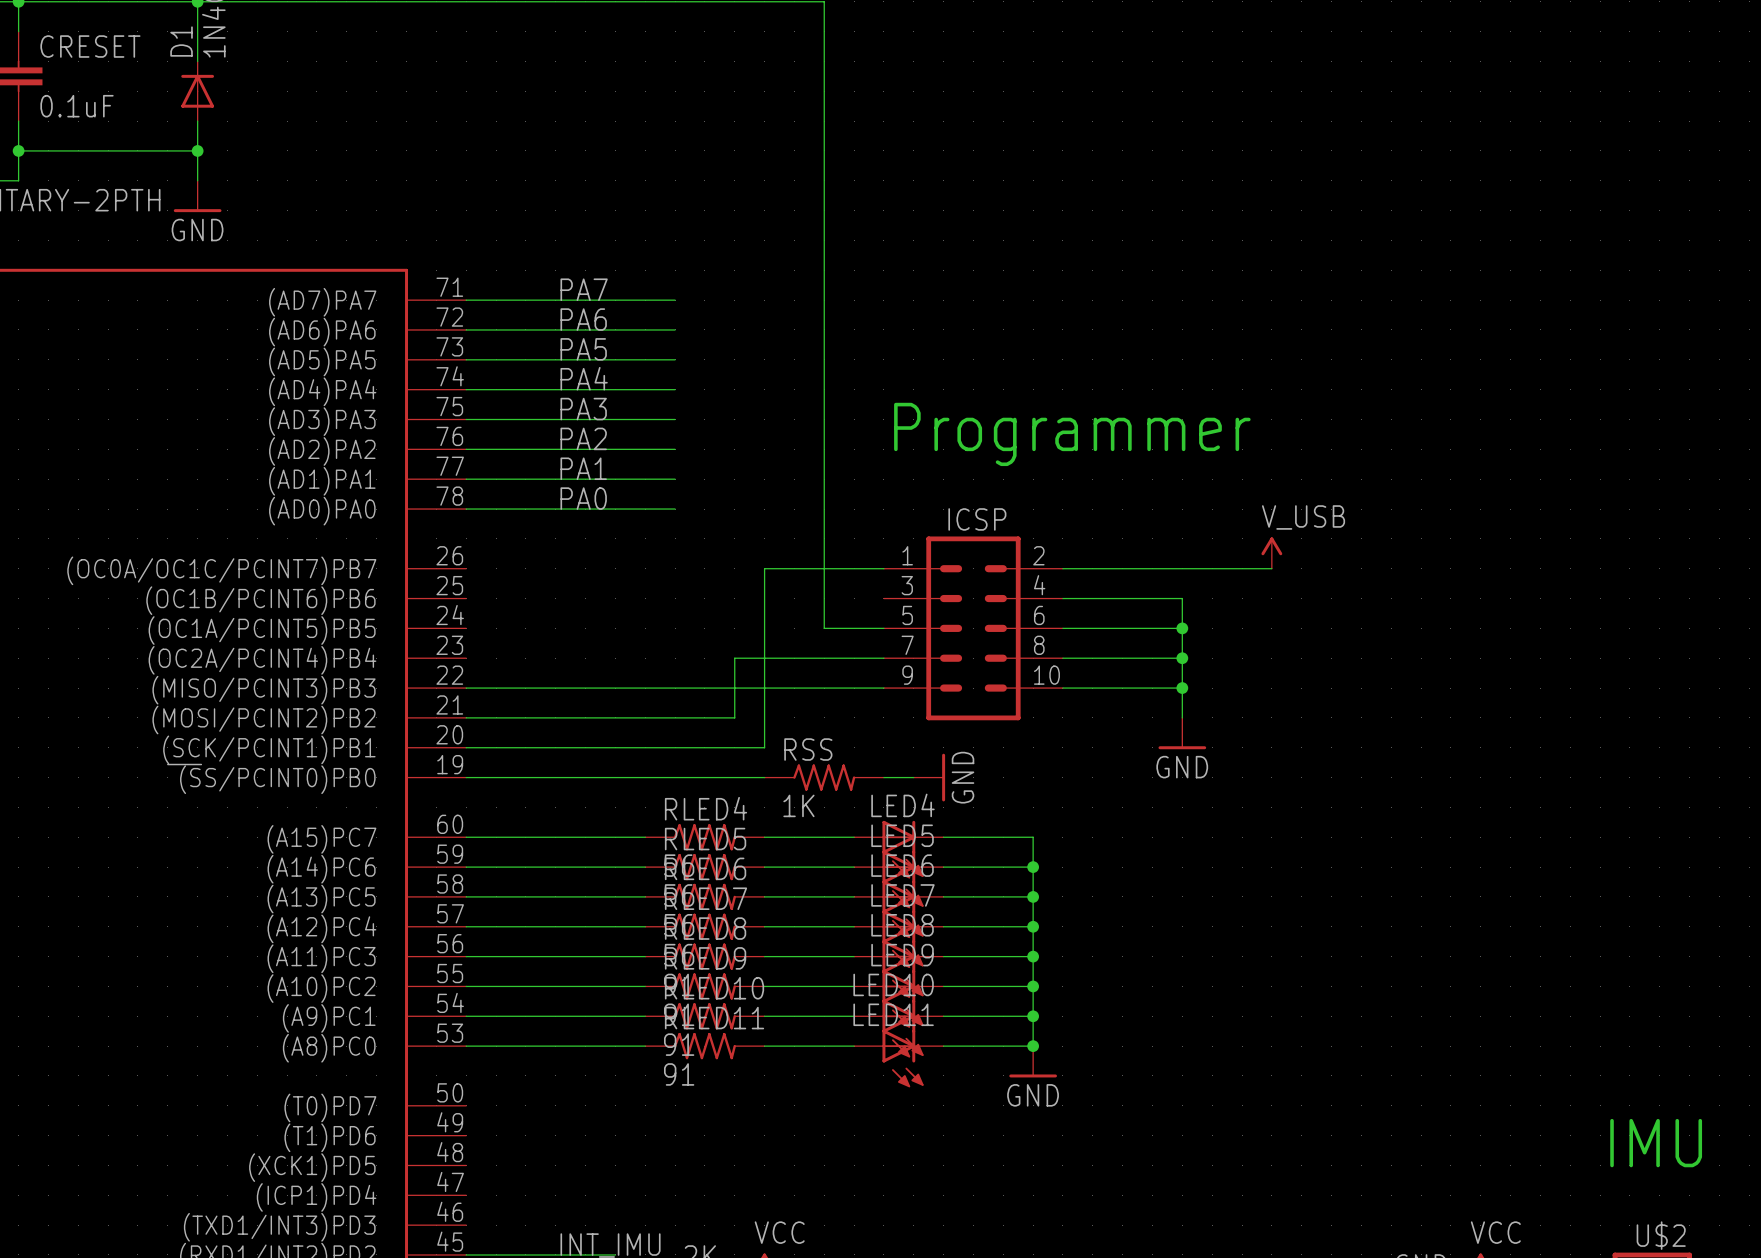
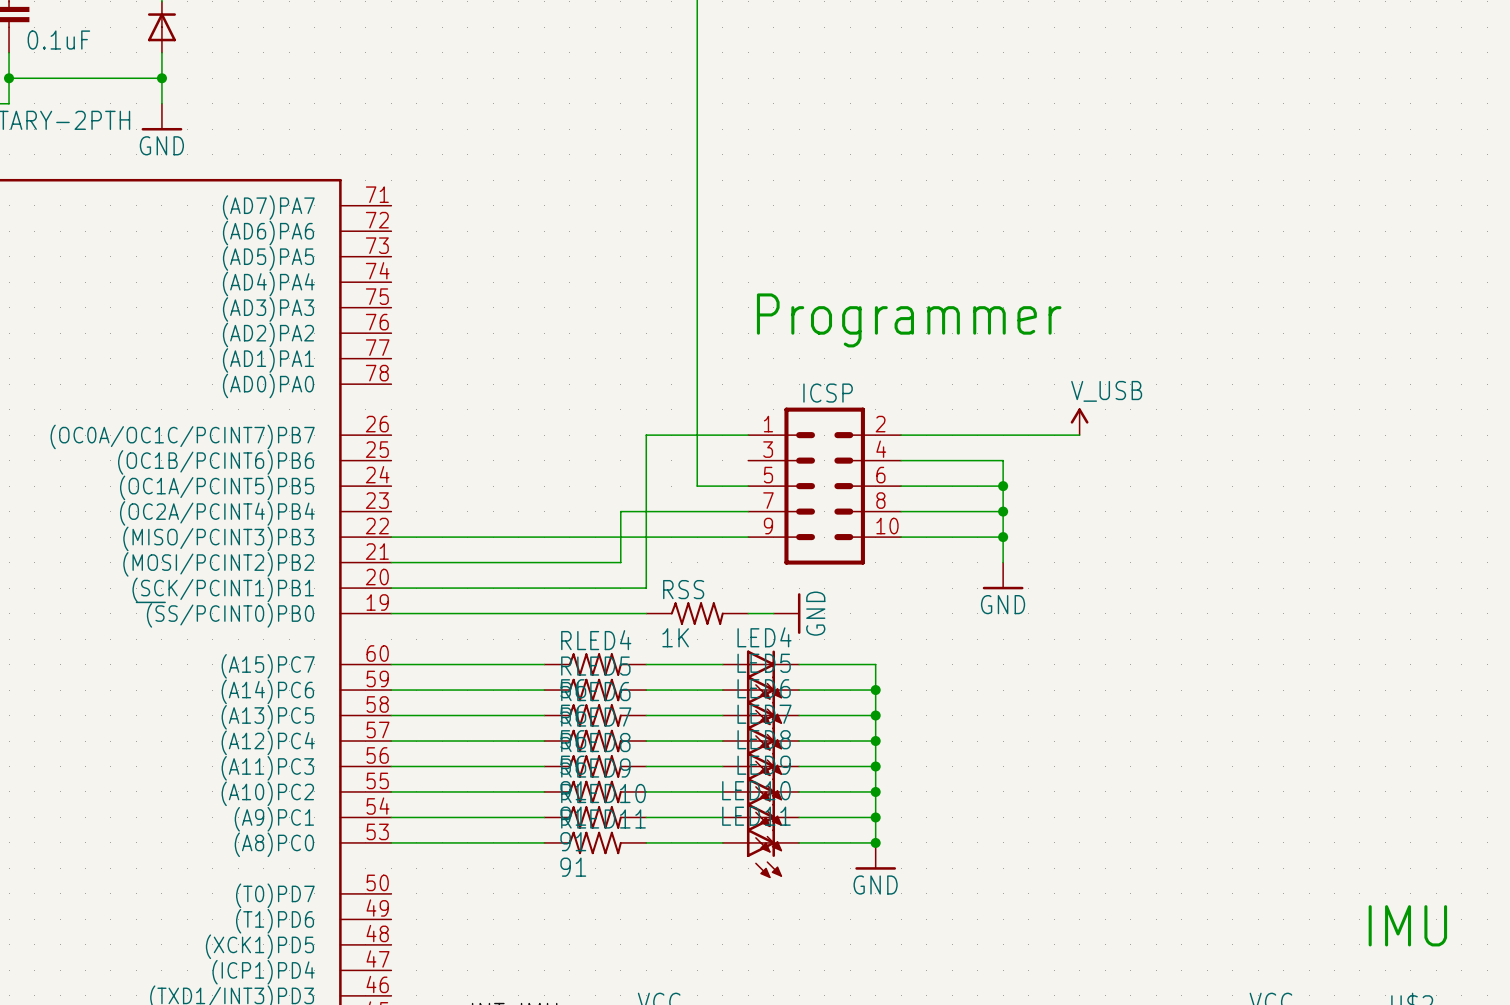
label: PA7 (584, 289) -> none
wire: (466, 300) (675, 300) -> none
label: PA6 (583, 319) -> none
wire: (466, 329) (675, 329) -> none
label: PA5 (583, 349) -> none
wire: (466, 359) (675, 359) -> none
label: PA4 (584, 378) -> none
wire: (466, 389) (675, 389) -> none
label: PA3 (583, 409) -> none
wire: (466, 419) (675, 419) -> none
label: PA2 (583, 438) -> none
wire: (466, 449) (675, 449) -> none
label: PA1 (583, 468) -> none
wire: (466, 479) (675, 479) -> none
label: PA0 (583, 498) -> none
wire: (466, 509) (675, 509) -> none

